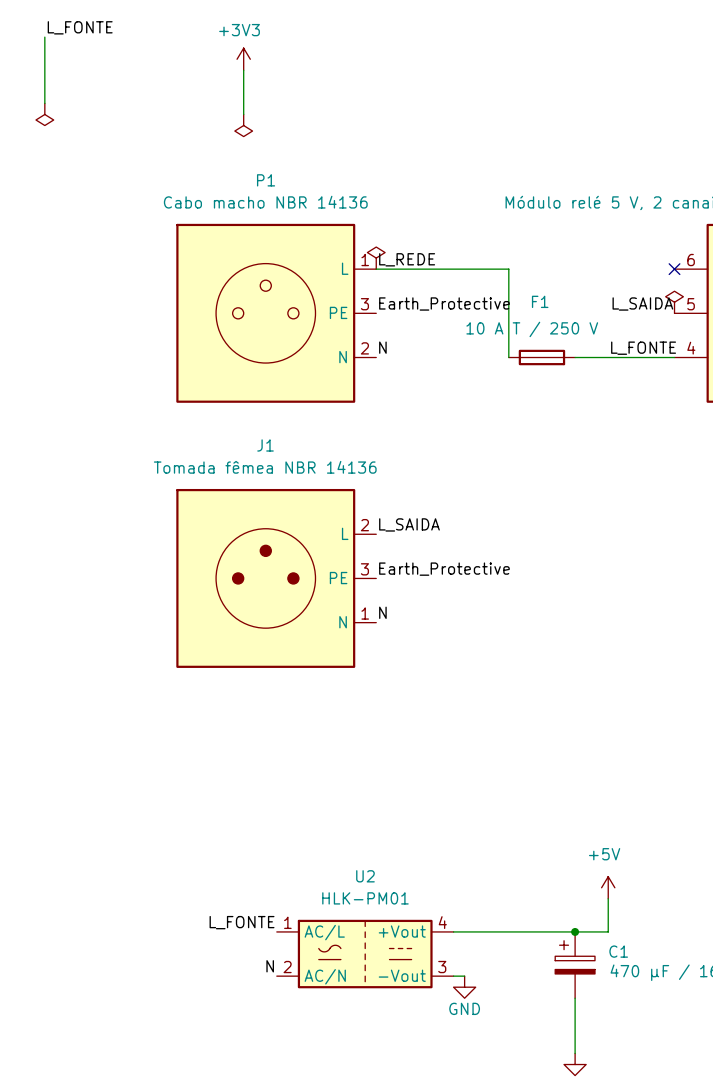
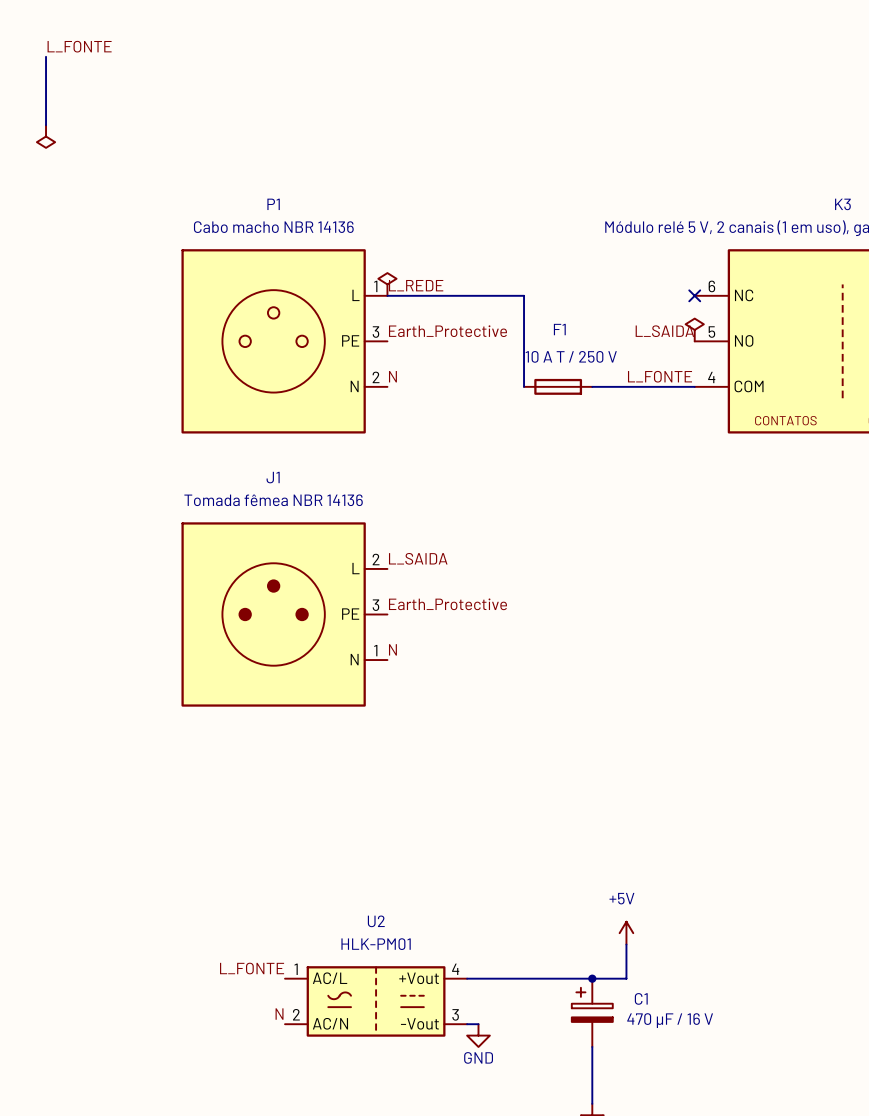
power symbol: +3V3 (243, 59) -> none
wire: (243, 70) (243, 114) -> none
power symbol: (243, 125) -> none

